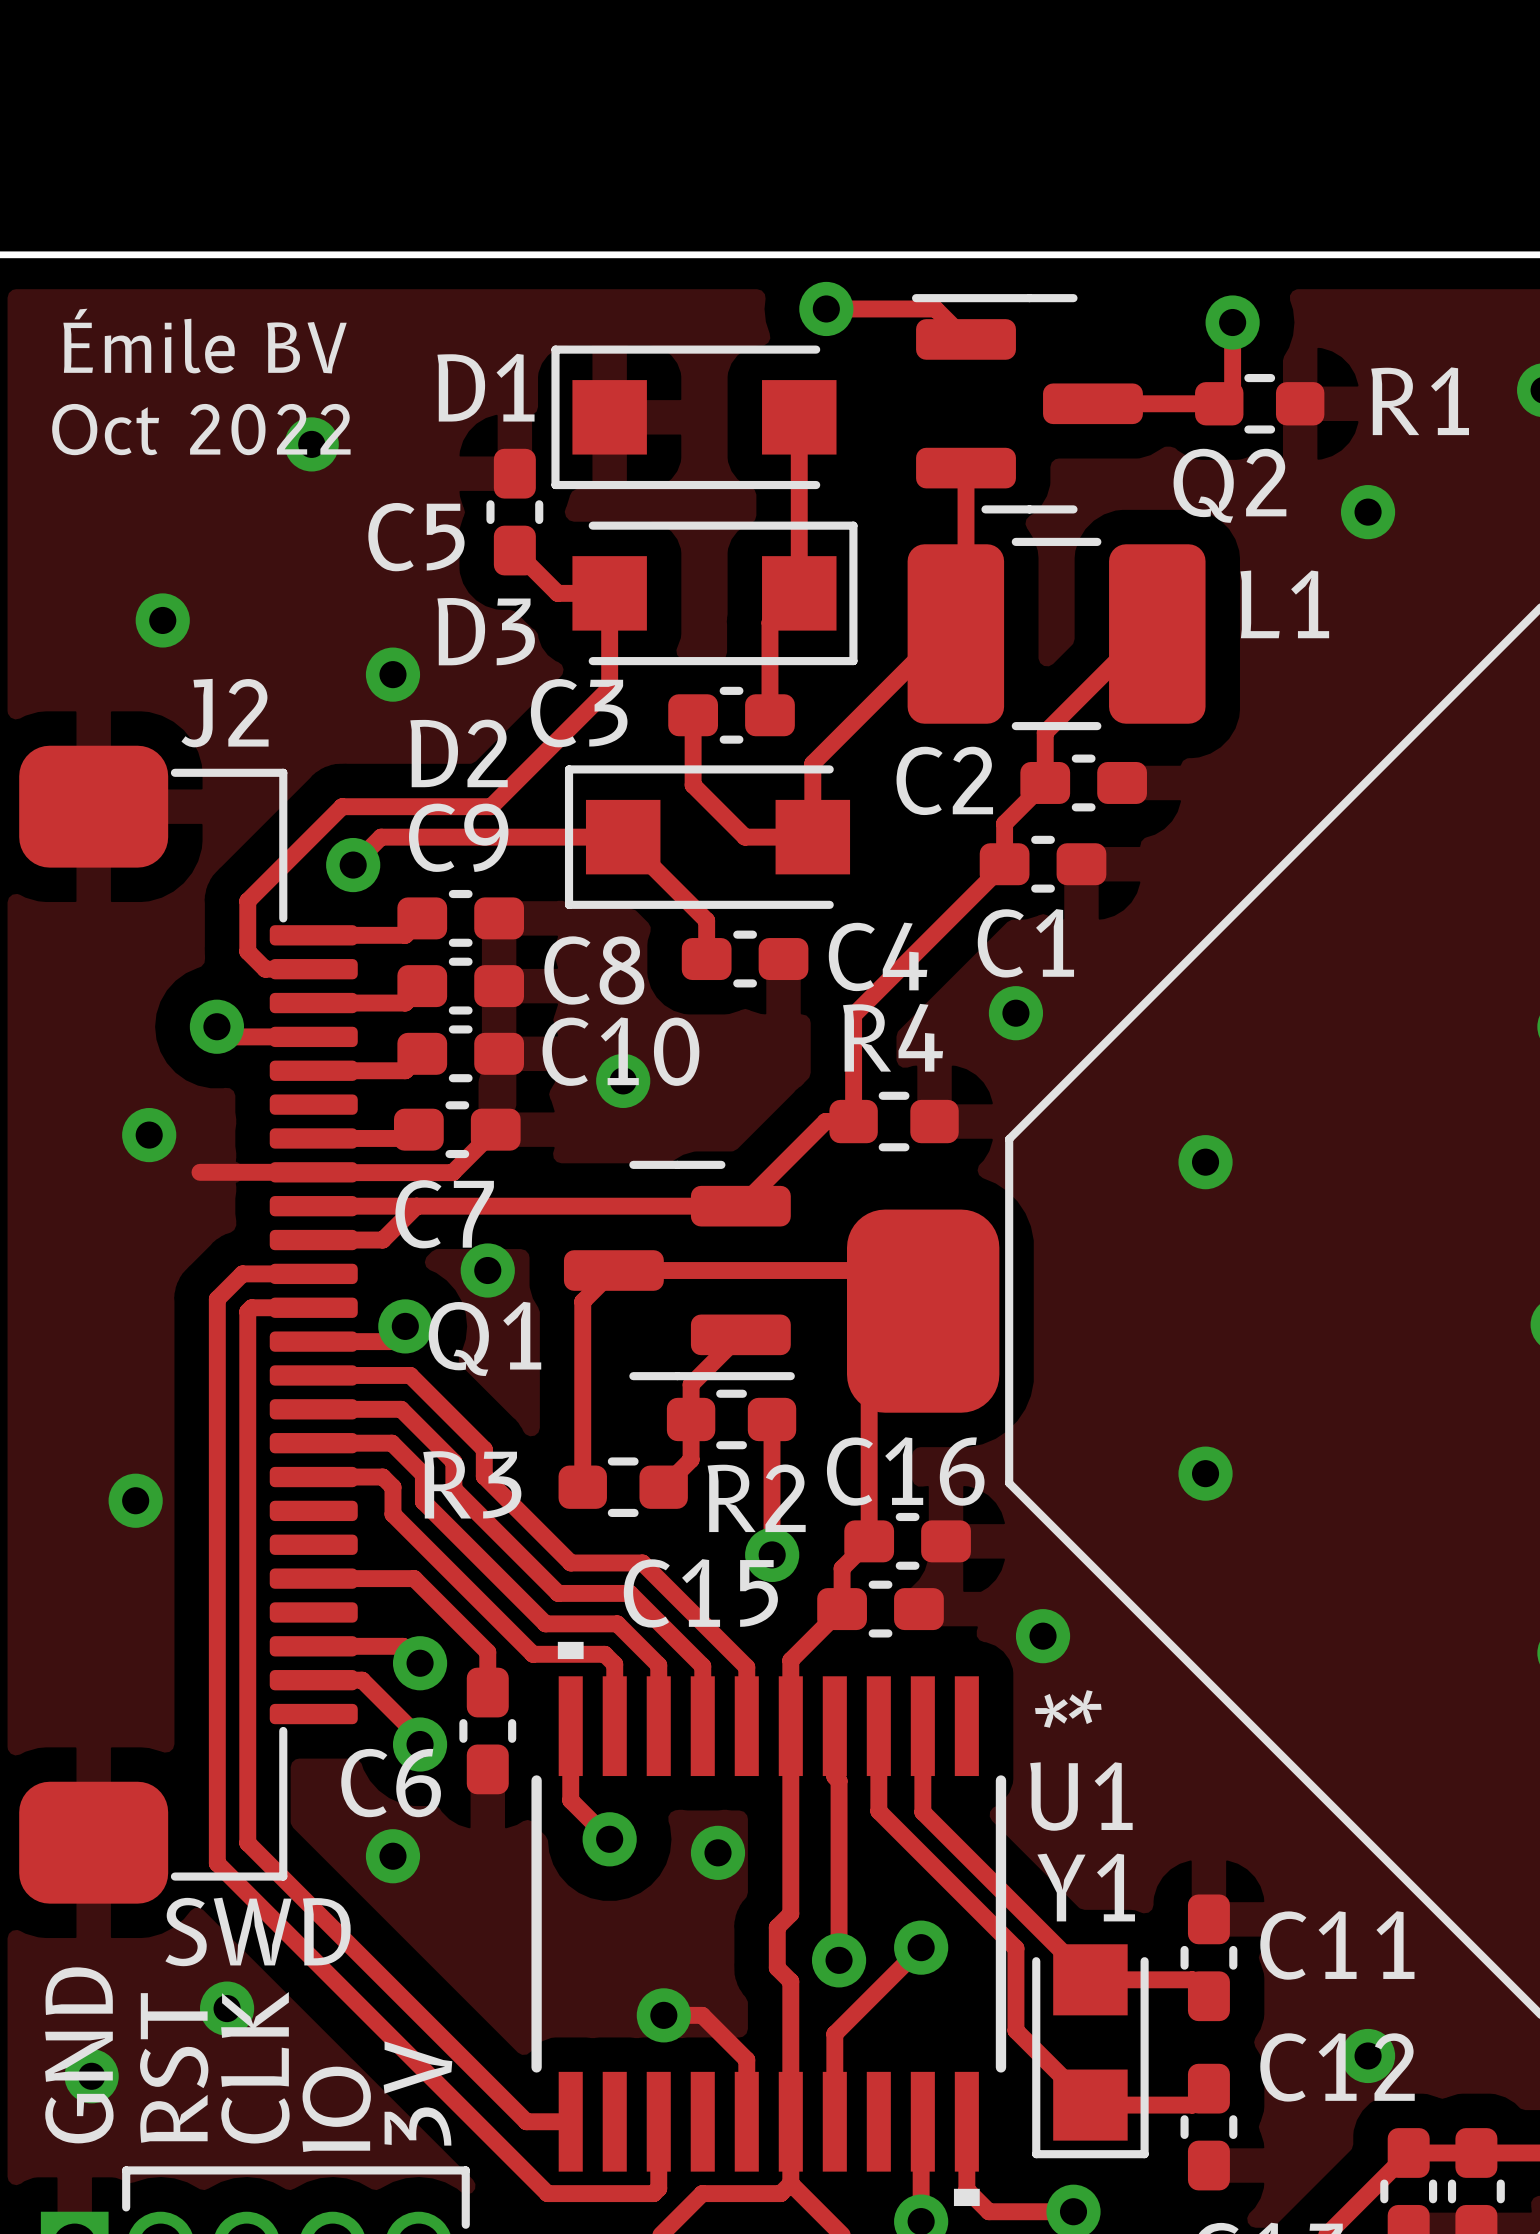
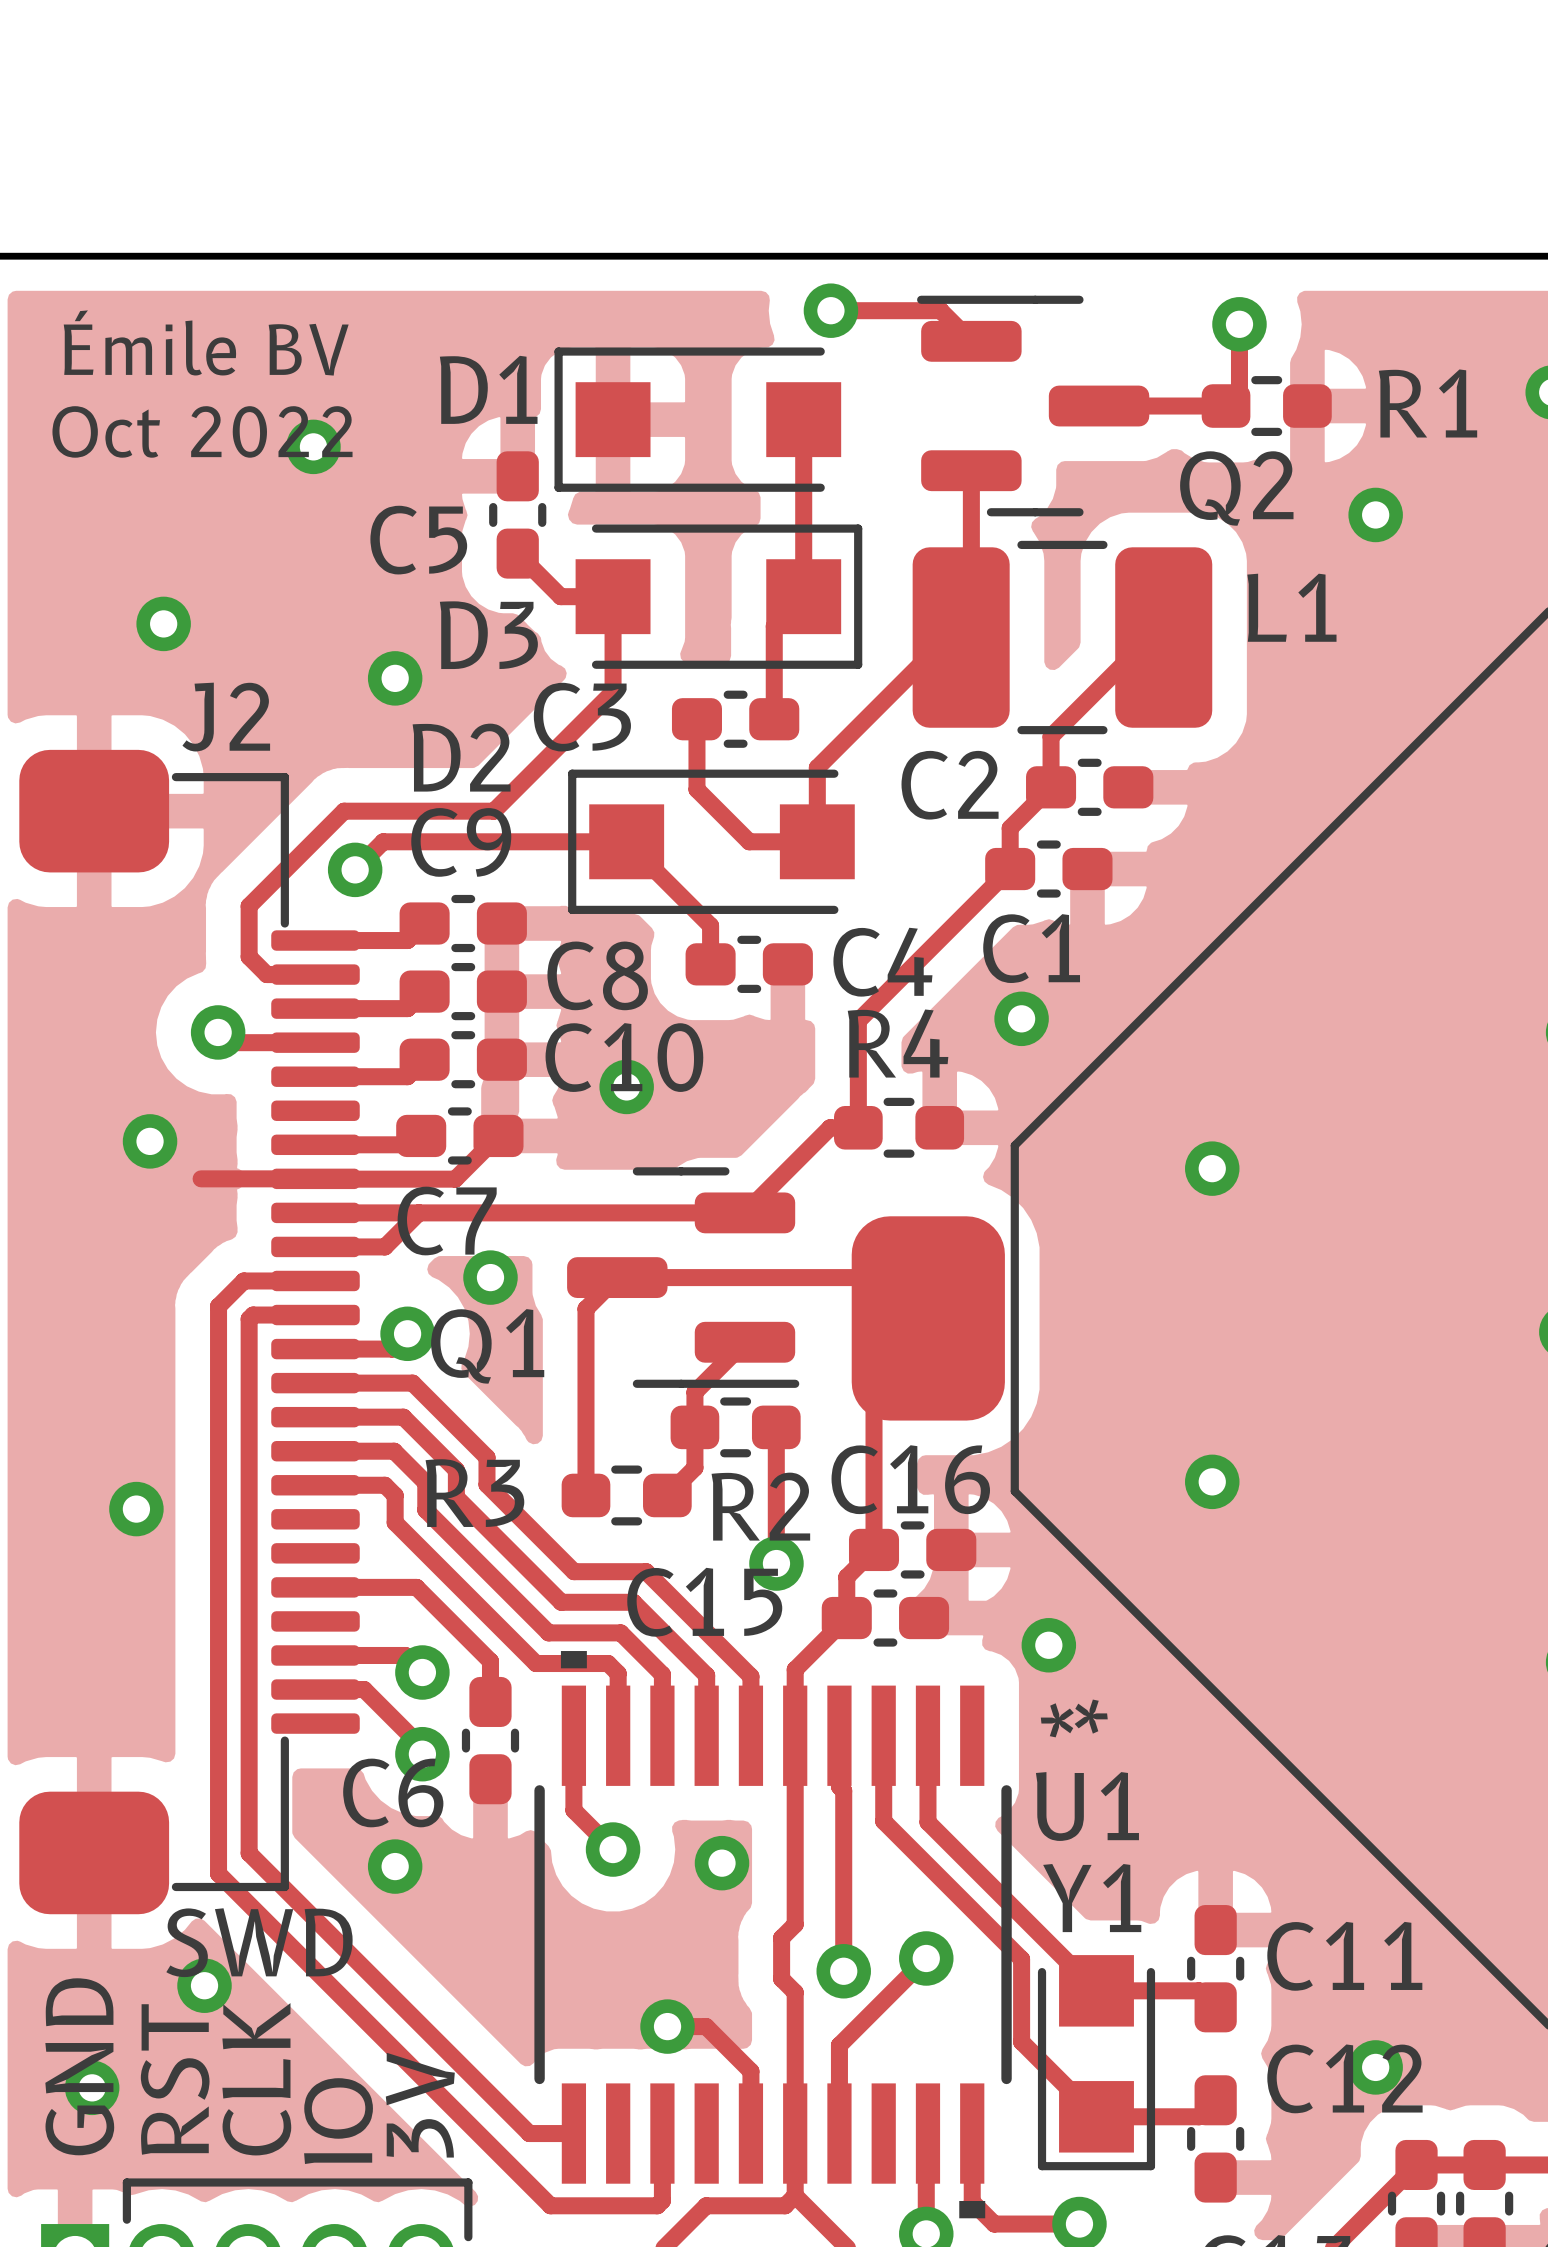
via position: (227, 2008) -> (204, 1985)

